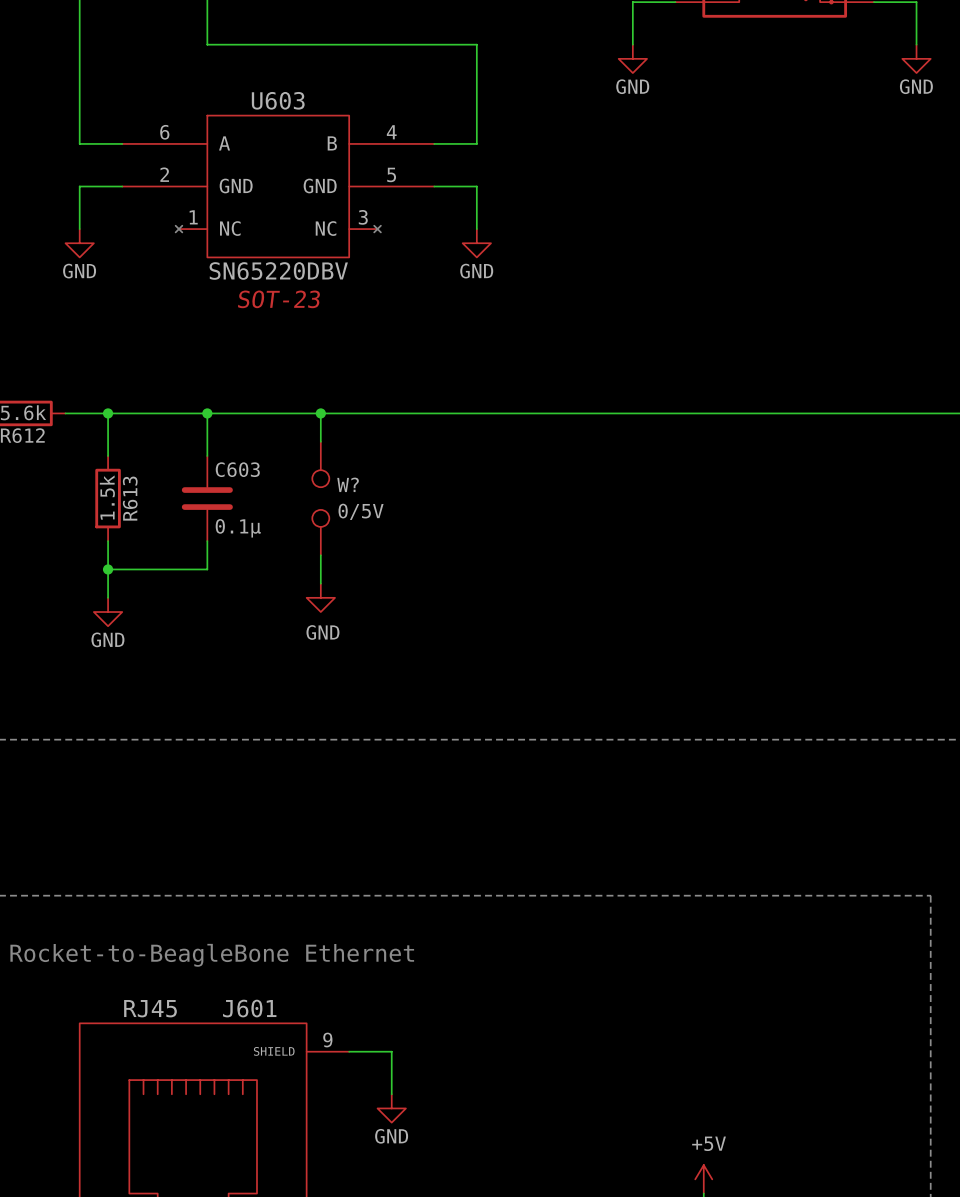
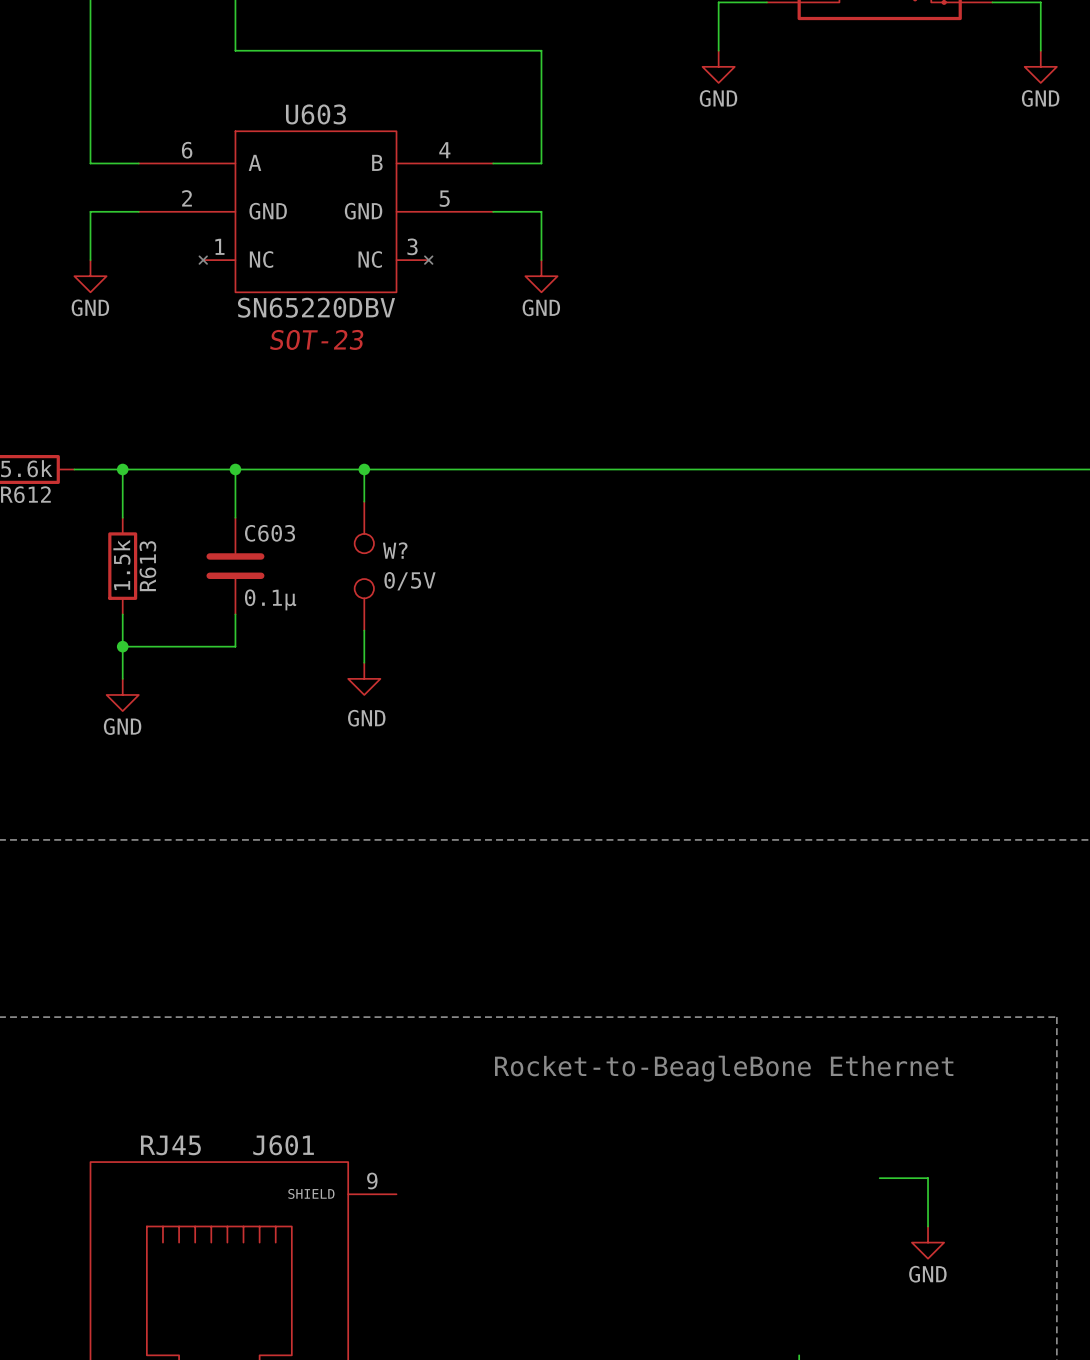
text: none -> Rocket-to-BeagleBone Ethernet (724, 1068)
text: Rocket-to-BeagleBone Ethernet (212, 955) -> none
wire: none -> (879, 1178) (928, 1178) (928, 1226)
wire: (349, 1051) (391, 1051) (391, 1094) -> none
power symbol: none -> GND (928, 1242)
power symbol: GND (391, 1108) -> none
power symbol: +5V (703, 1179) -> none

